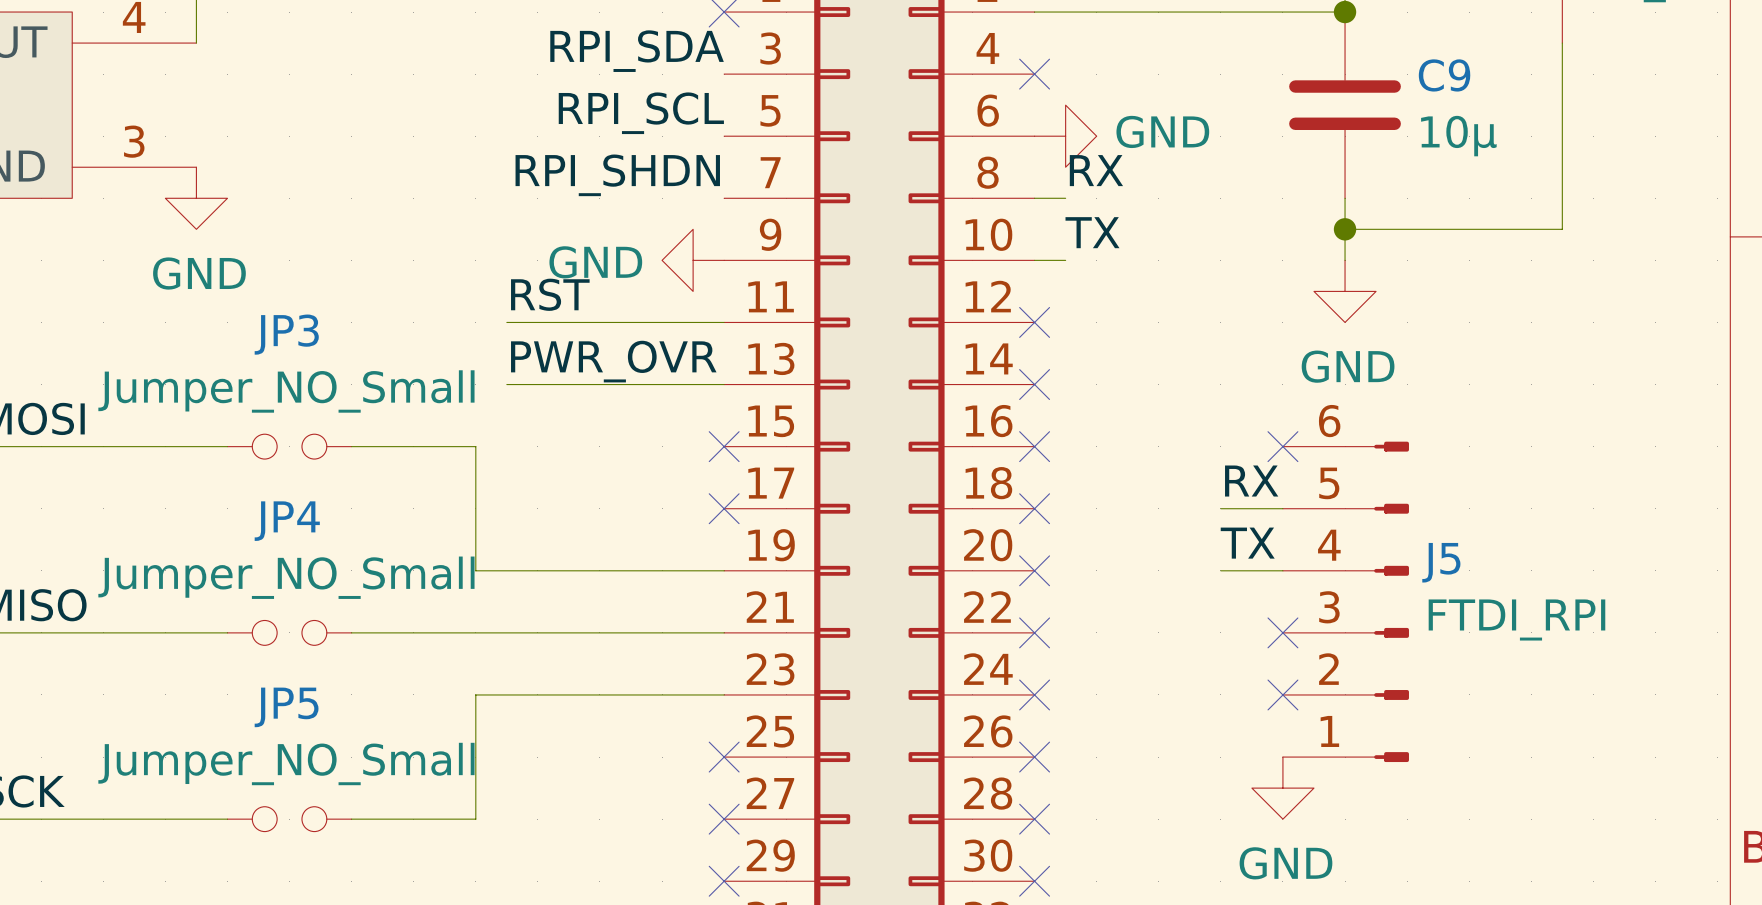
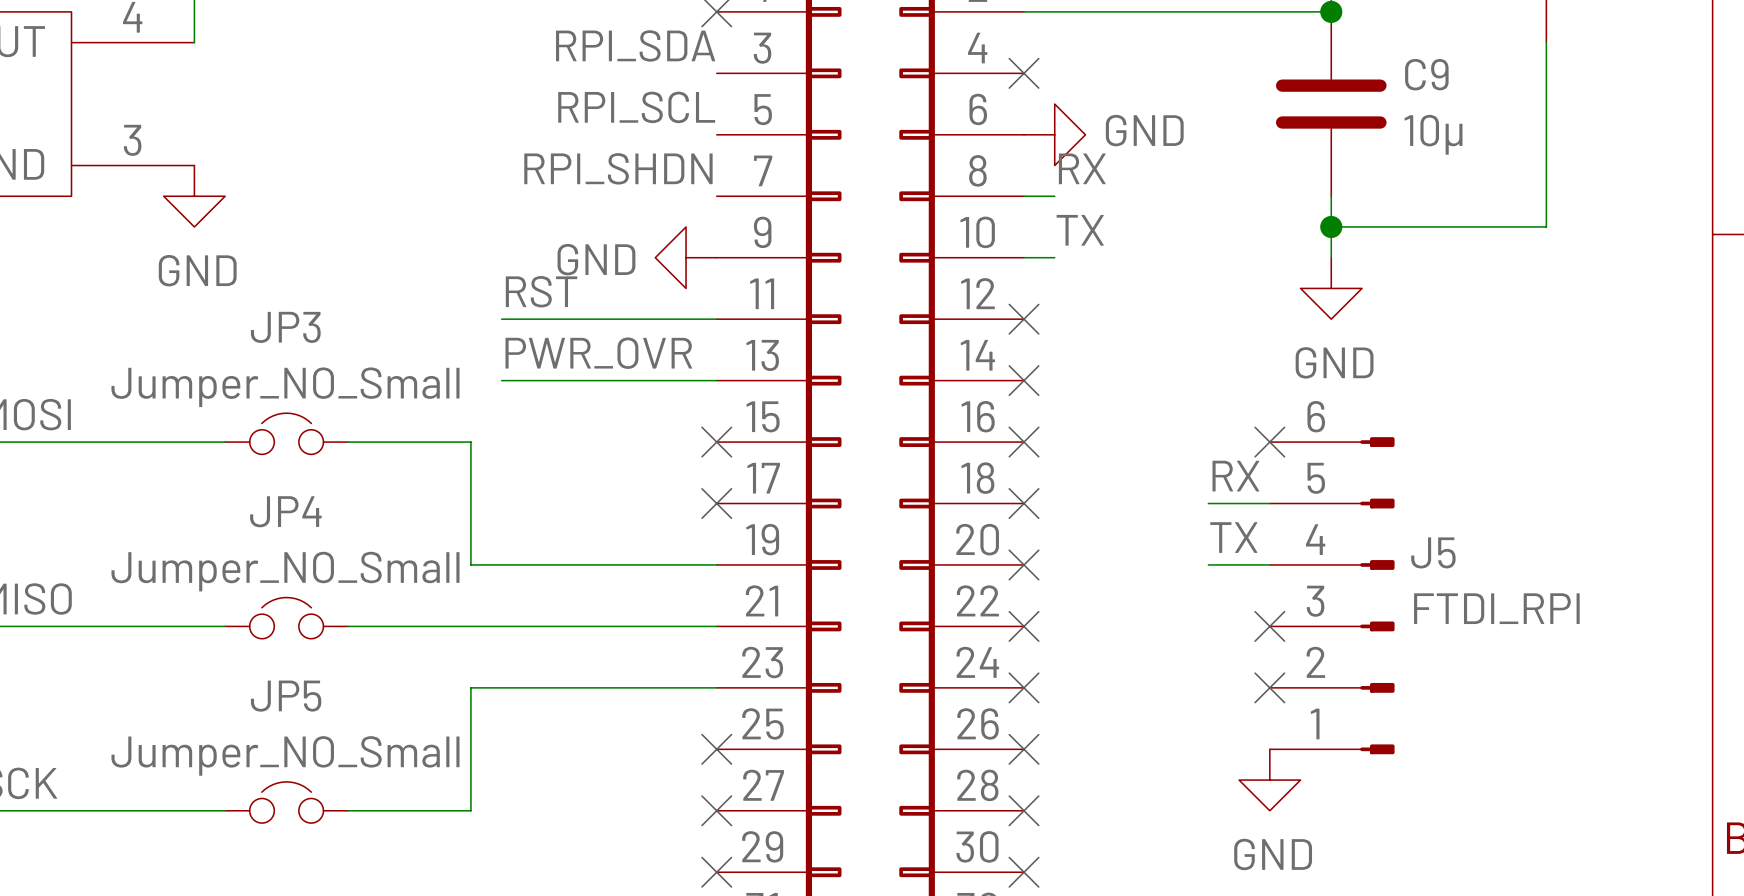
JP3 symbol: [227, 434, 352, 460] -> [225, 413, 349, 455]
JP4 symbol: [227, 620, 352, 646] -> [225, 597, 349, 639]
JP5 symbol: [227, 806, 352, 832] -> [225, 781, 349, 824]

